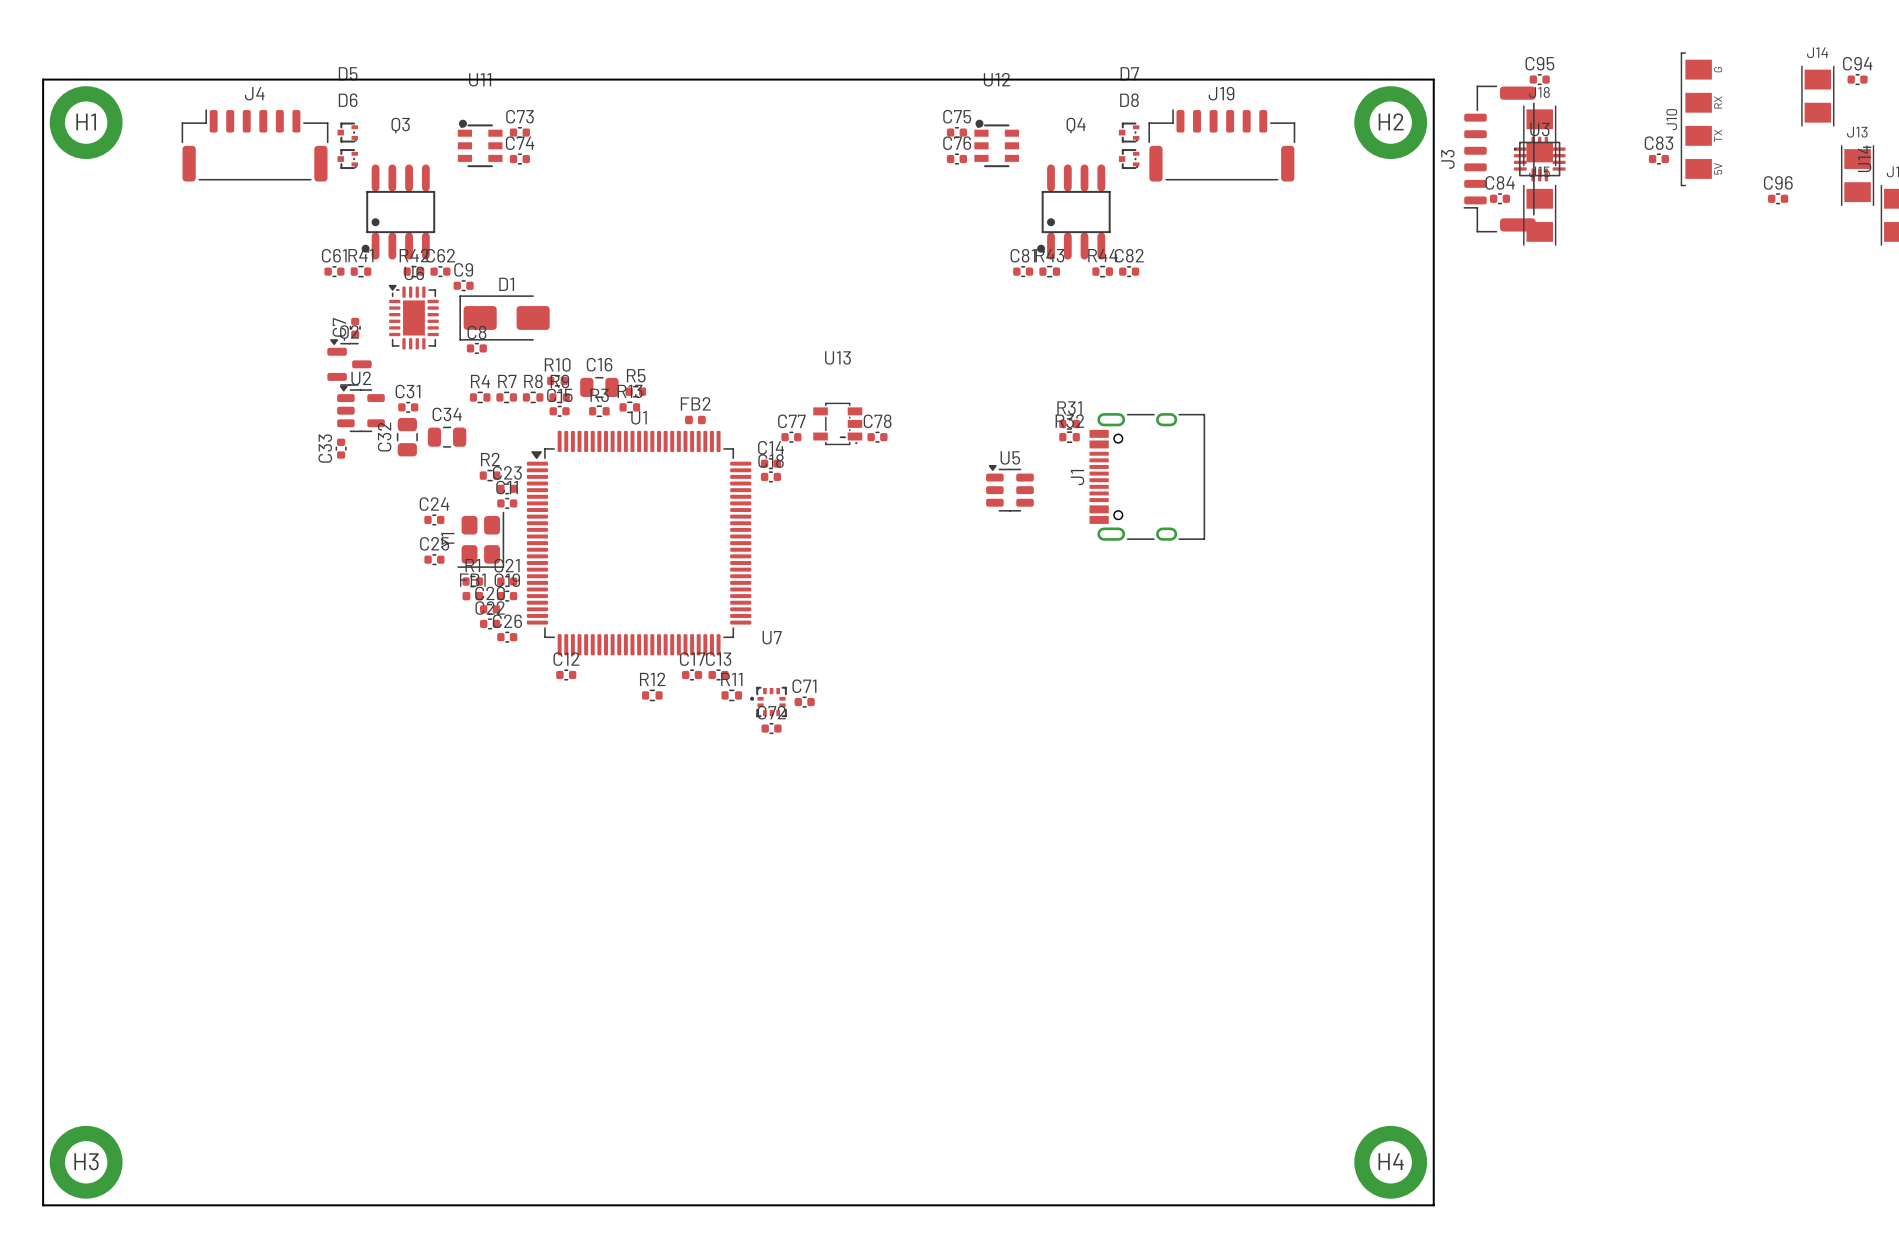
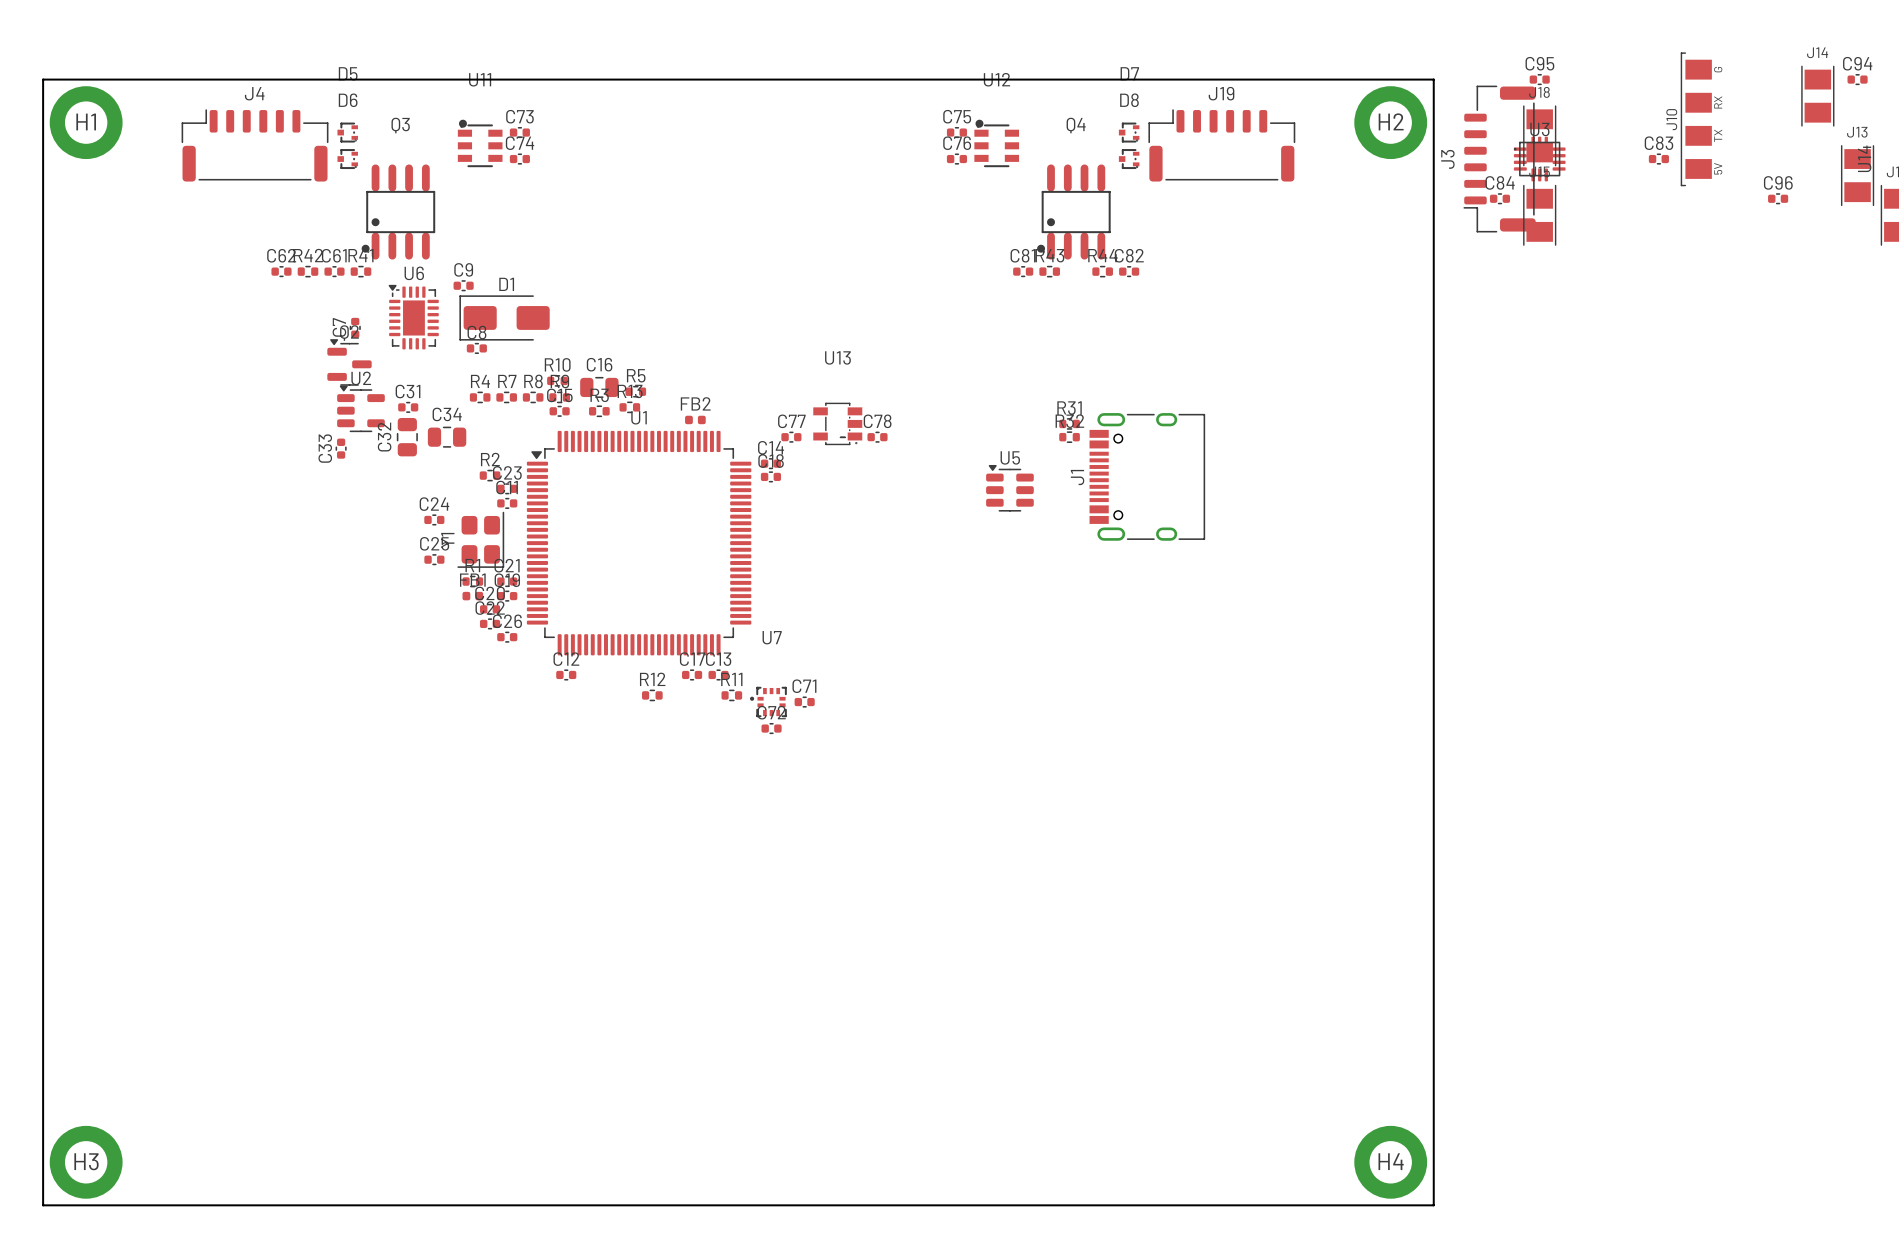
R42 position: (413, 271) -> (308, 271)
C62 position: (440, 271) -> (281, 271)

